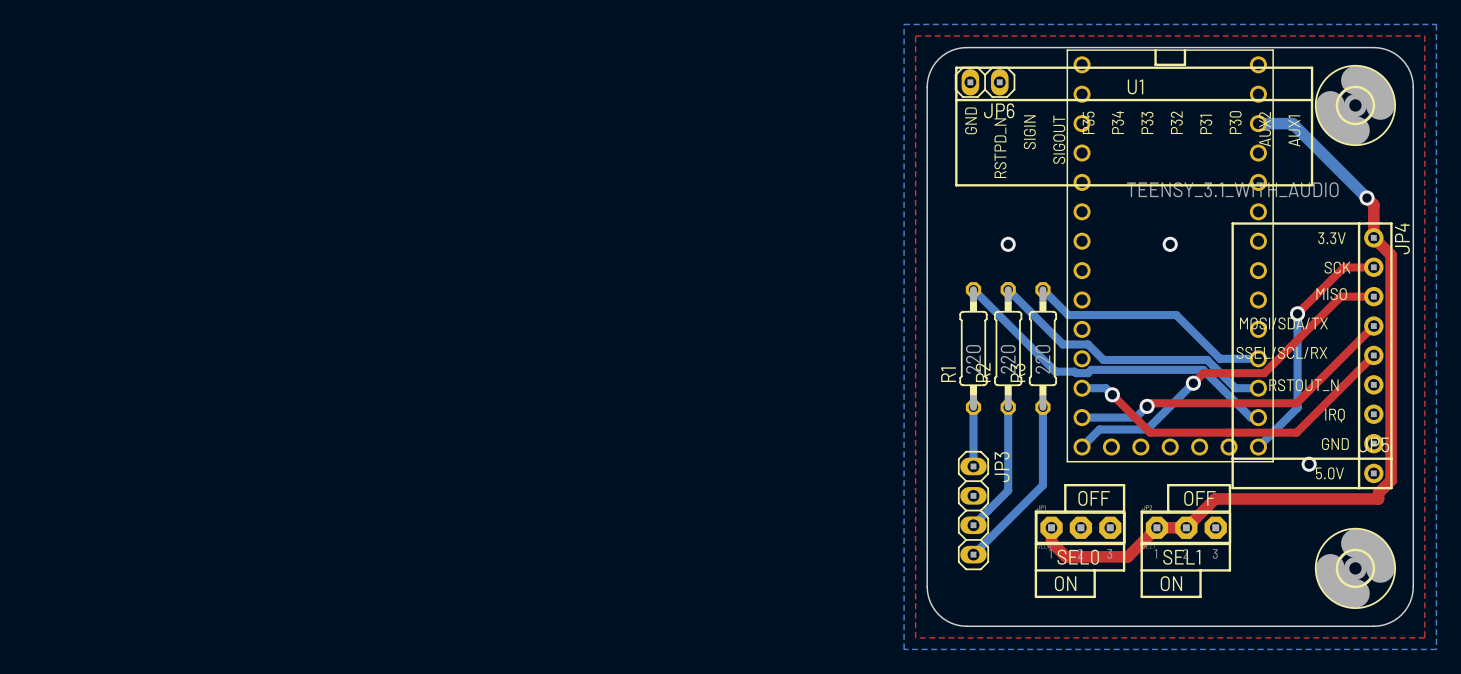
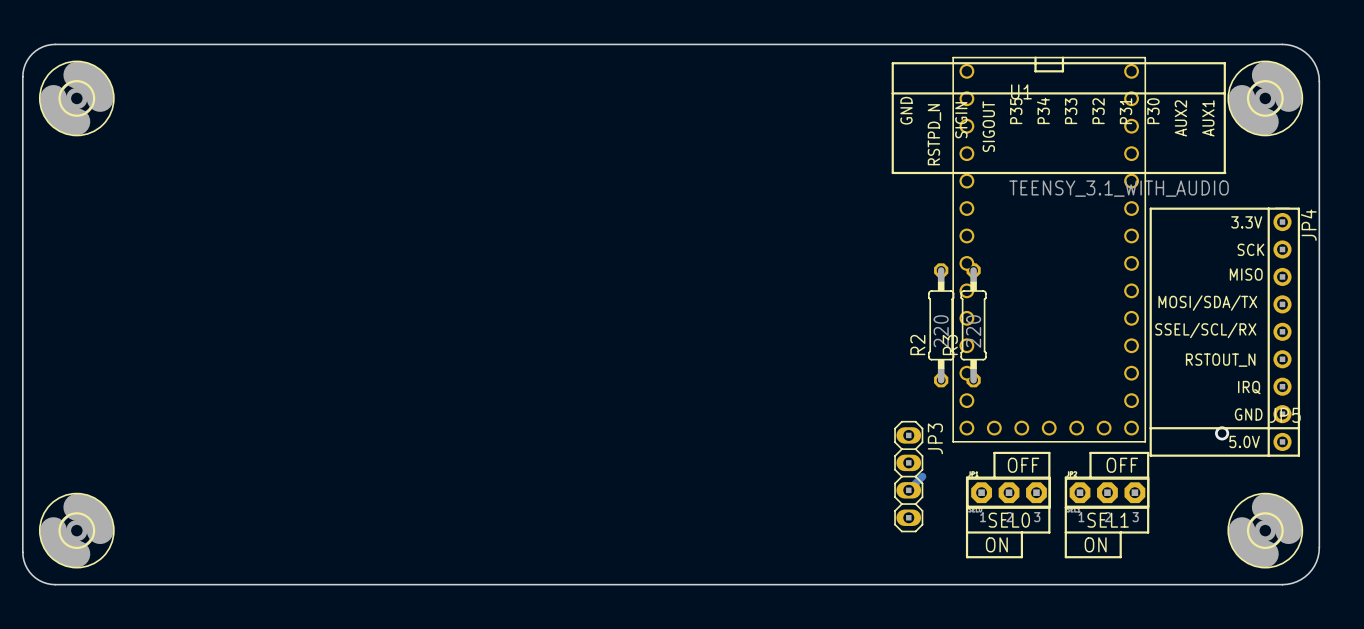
bottom zone outline: (904, 24) (1436, 24) (1436, 649) (904, 649) (904, 24) -> none
top zone outline: (915, 36) (1424, 36) (1424, 637) (915, 637) (915, 36) -> none
board edge: (966, 47) (951, 50) (938, 59) (930, 71) (927, 87) (927, 591) (932, 606) (942, 618) (956, 624) (966, 626) -> (902, 44) (55, 44) (42, 46) (32, 53) (25, 64) (22, 76) (22, 552) (27, 568) (39, 580) (55, 584) (902, 584)
U1 footprint: [1066, 48, 1274, 463] -> [952, 56, 1146, 443]
JP6: (985, 82) -> none
part: none -> (76, 98)
bottom track: (1258, 123) (1292, 123) (1367, 198) -> none
top track: (1367, 198) (1373, 204) (1373, 237) (1391, 255) (1391, 480) (1378, 493) (1378, 498) (1215, 498) (1186, 527) (1156, 527) (1127, 556) (1066, 556) (1051, 542) (1051, 527) -> none
via: (1367, 198) -> none
via: (1008, 244) -> none
via: (1170, 244) -> none
top track: (1373, 267) (1343, 267) (1297, 313) -> none
bottom track: (973, 289) (1055, 371) (1088, 373) (1091, 369) (1203, 369) (1250, 417) (1258, 417) -> none
bottom track: (1008, 289) (1062, 344) (1088, 344) (1103, 359) (1207, 359) (1235, 388) (1258, 388) -> none
bottom track: (1042, 289) (1068, 315) (1176, 315) (1220, 358) (1258, 358) -> none
top track: (1373, 296) (1340, 296) (1264, 373) (1203, 373) (1193, 383) -> none
bottom track: (1297, 313) (1297, 407) (1258, 447) -> none
via: (1297, 313) -> none
top track: (1373, 326) (1296, 403) (1150, 403) (1147, 406) -> none
R1: 220 (973, 348) -> none
top track: (1373, 355) (1296, 432) (1150, 432) (1112, 394) -> none
bottom track: (1193, 383) (1147, 429) (1099, 429) (1082, 447) -> none
via: (1193, 383) -> none
bottom track: (1082, 388) (1105, 388) (1112, 394) -> none
via: (1112, 394) -> none
bottom track: (1147, 406) (1135, 417) (1082, 417) -> none
via: (1147, 406) -> none
bottom track: (973, 407) (973, 466) -> none
bottom track: (1008, 407) (1008, 490) (988, 510) -> none
bottom track: (1042, 407) (1042, 485) (973, 554) -> none
part: none -> (76, 530)

